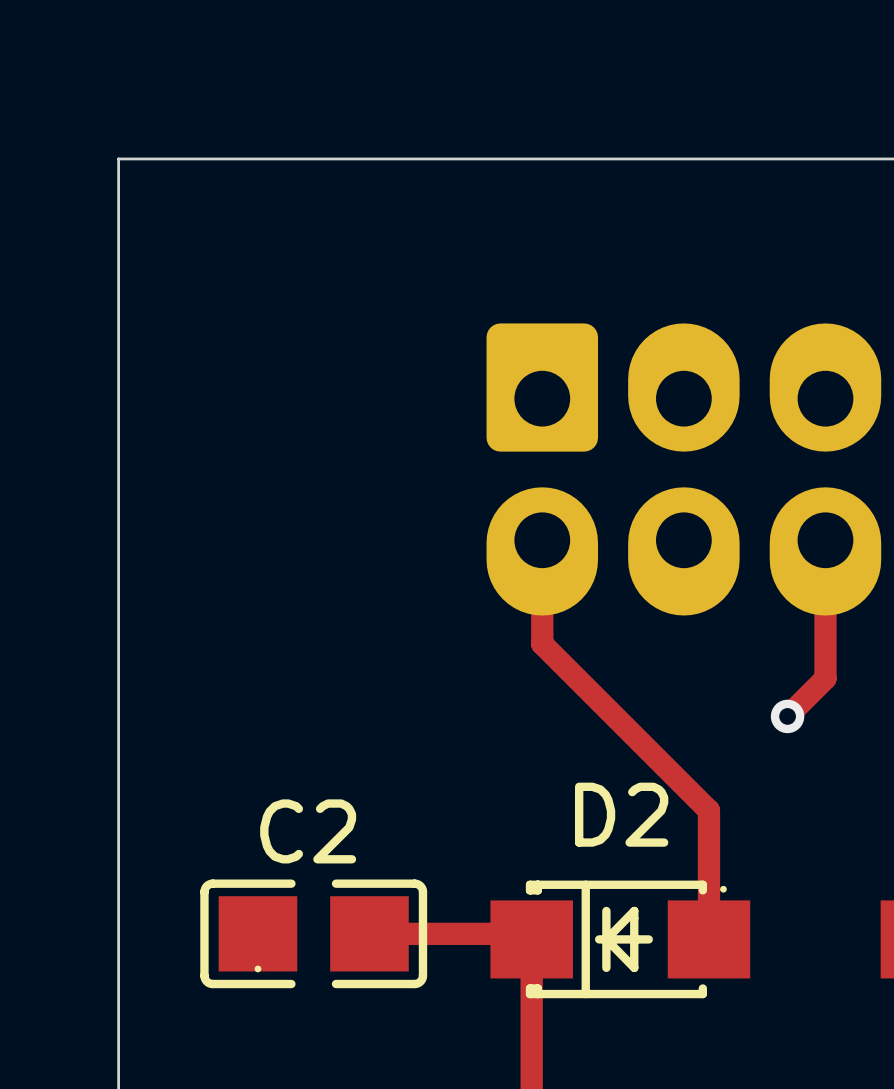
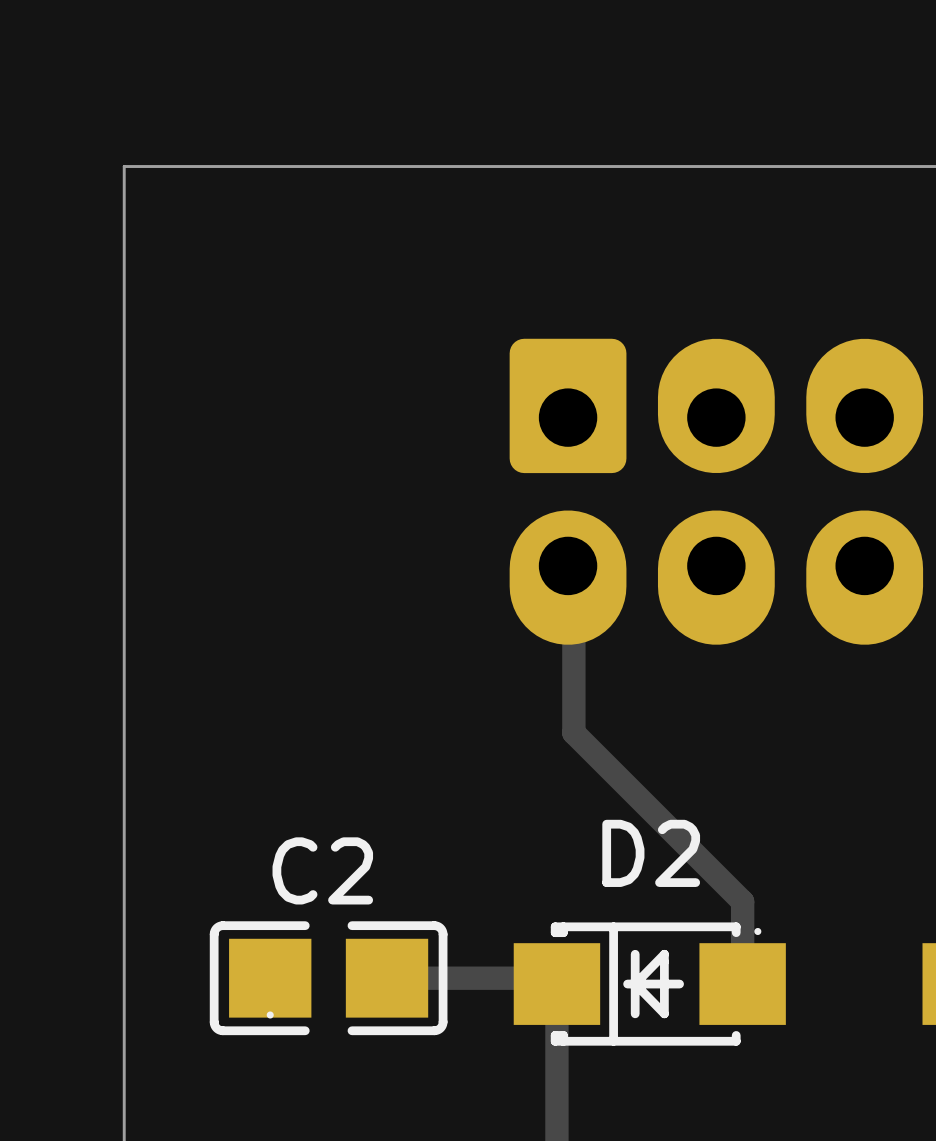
track: (542, 540) (542, 643) (708, 810) (708, 860) -> (568, 565) (573, 571) (573, 732) (742, 901)
track: (825, 540) (825, 678) (787, 716) -> none
via: (787, 716) -> none

